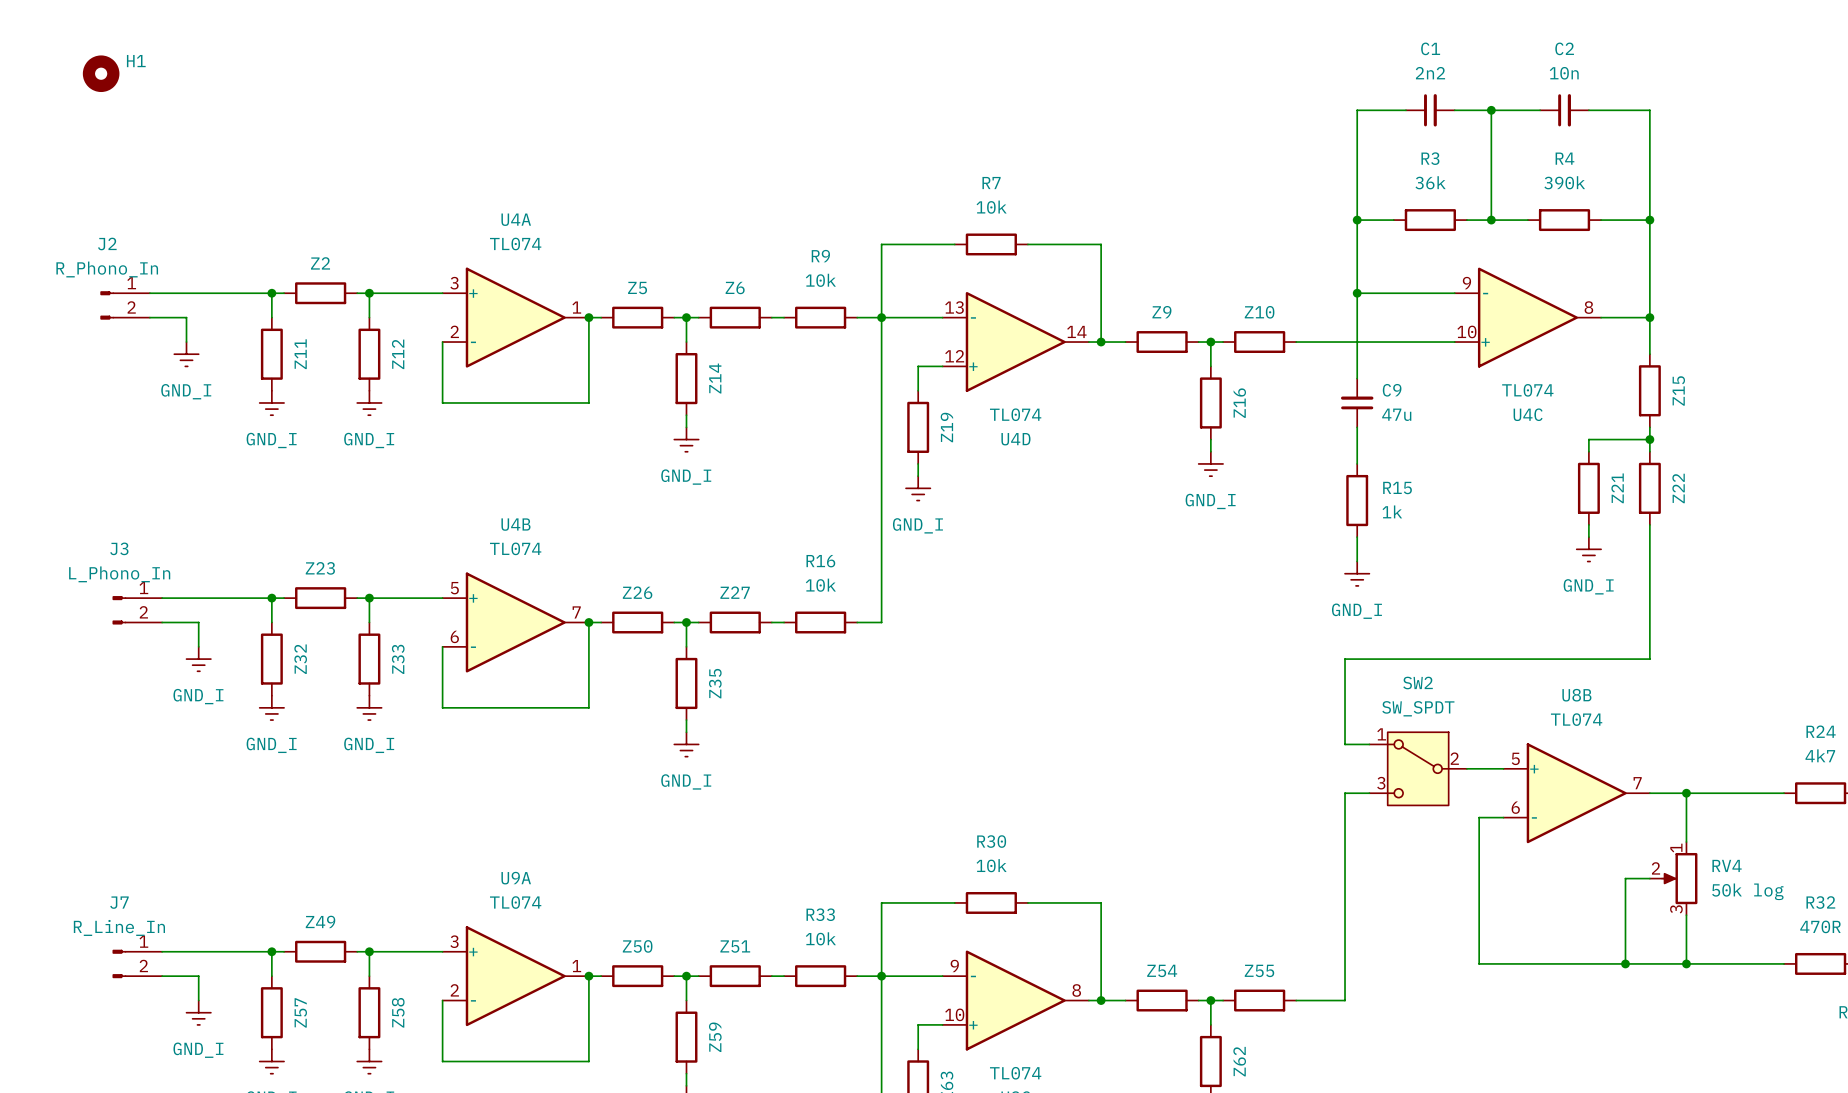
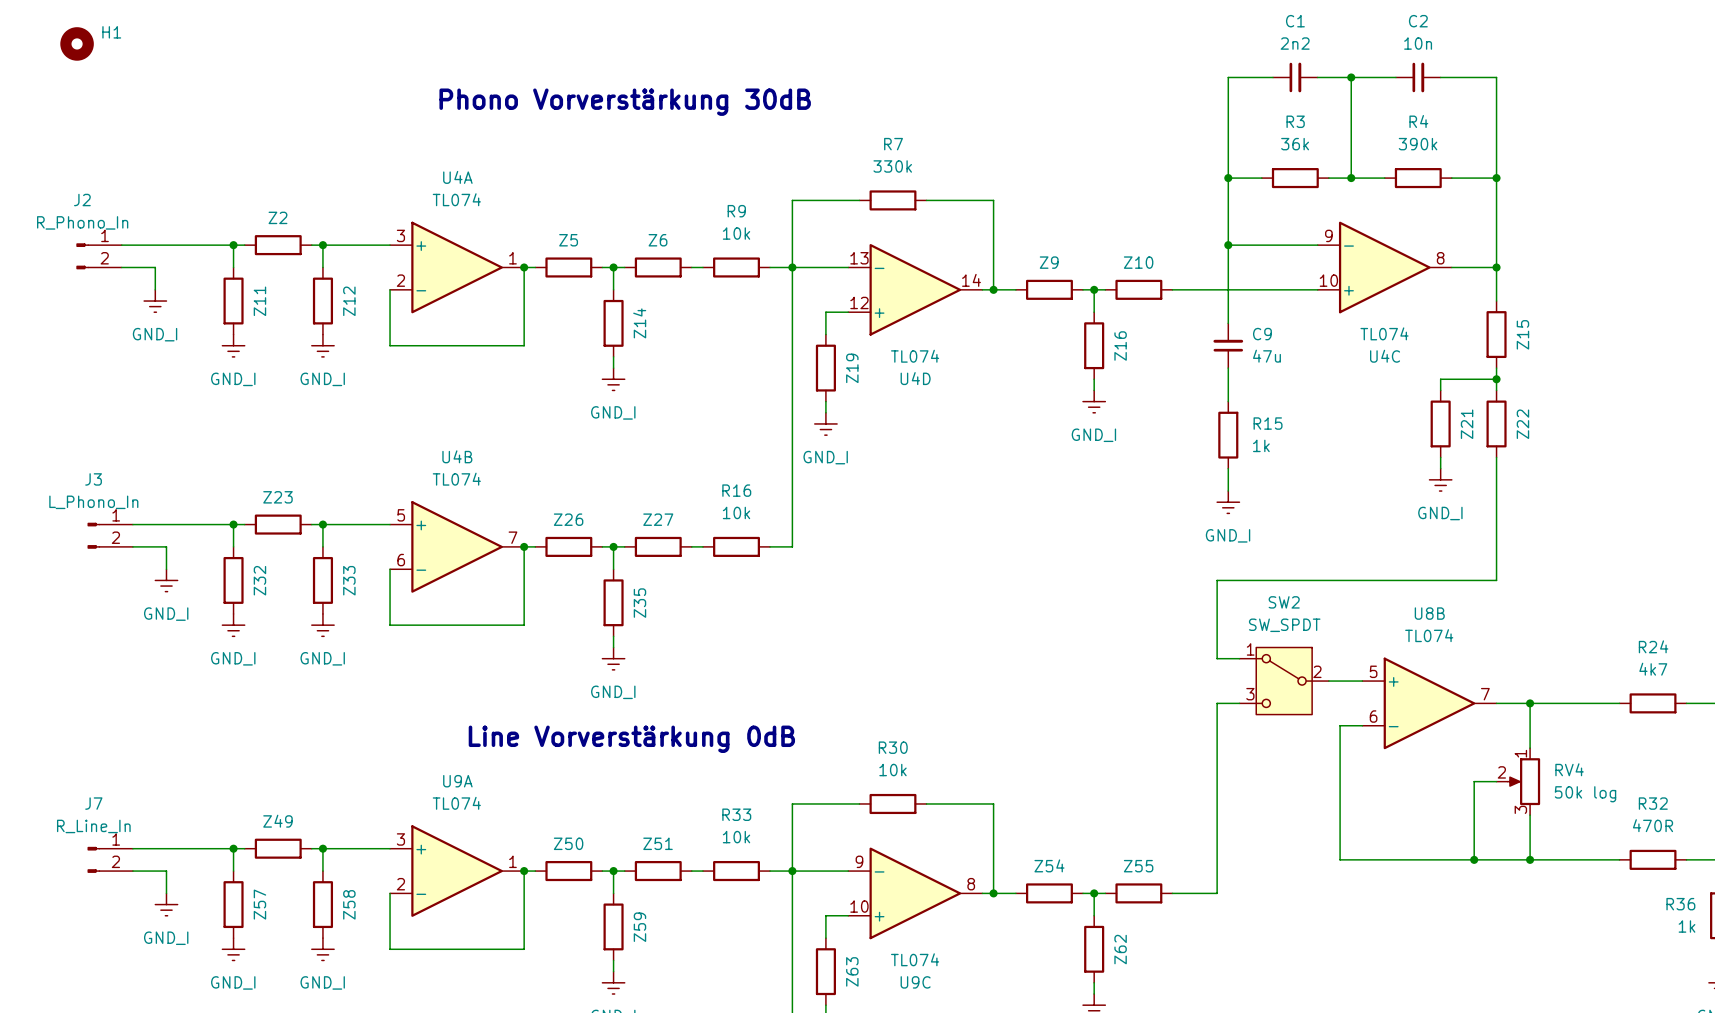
text: none -> Phono Vorverstärkung 30dB (625, 102)
R7 value: 10k (991, 207) -> 330k (892, 166)
text: none -> Line Vorverstärkung 0dB (631, 739)

